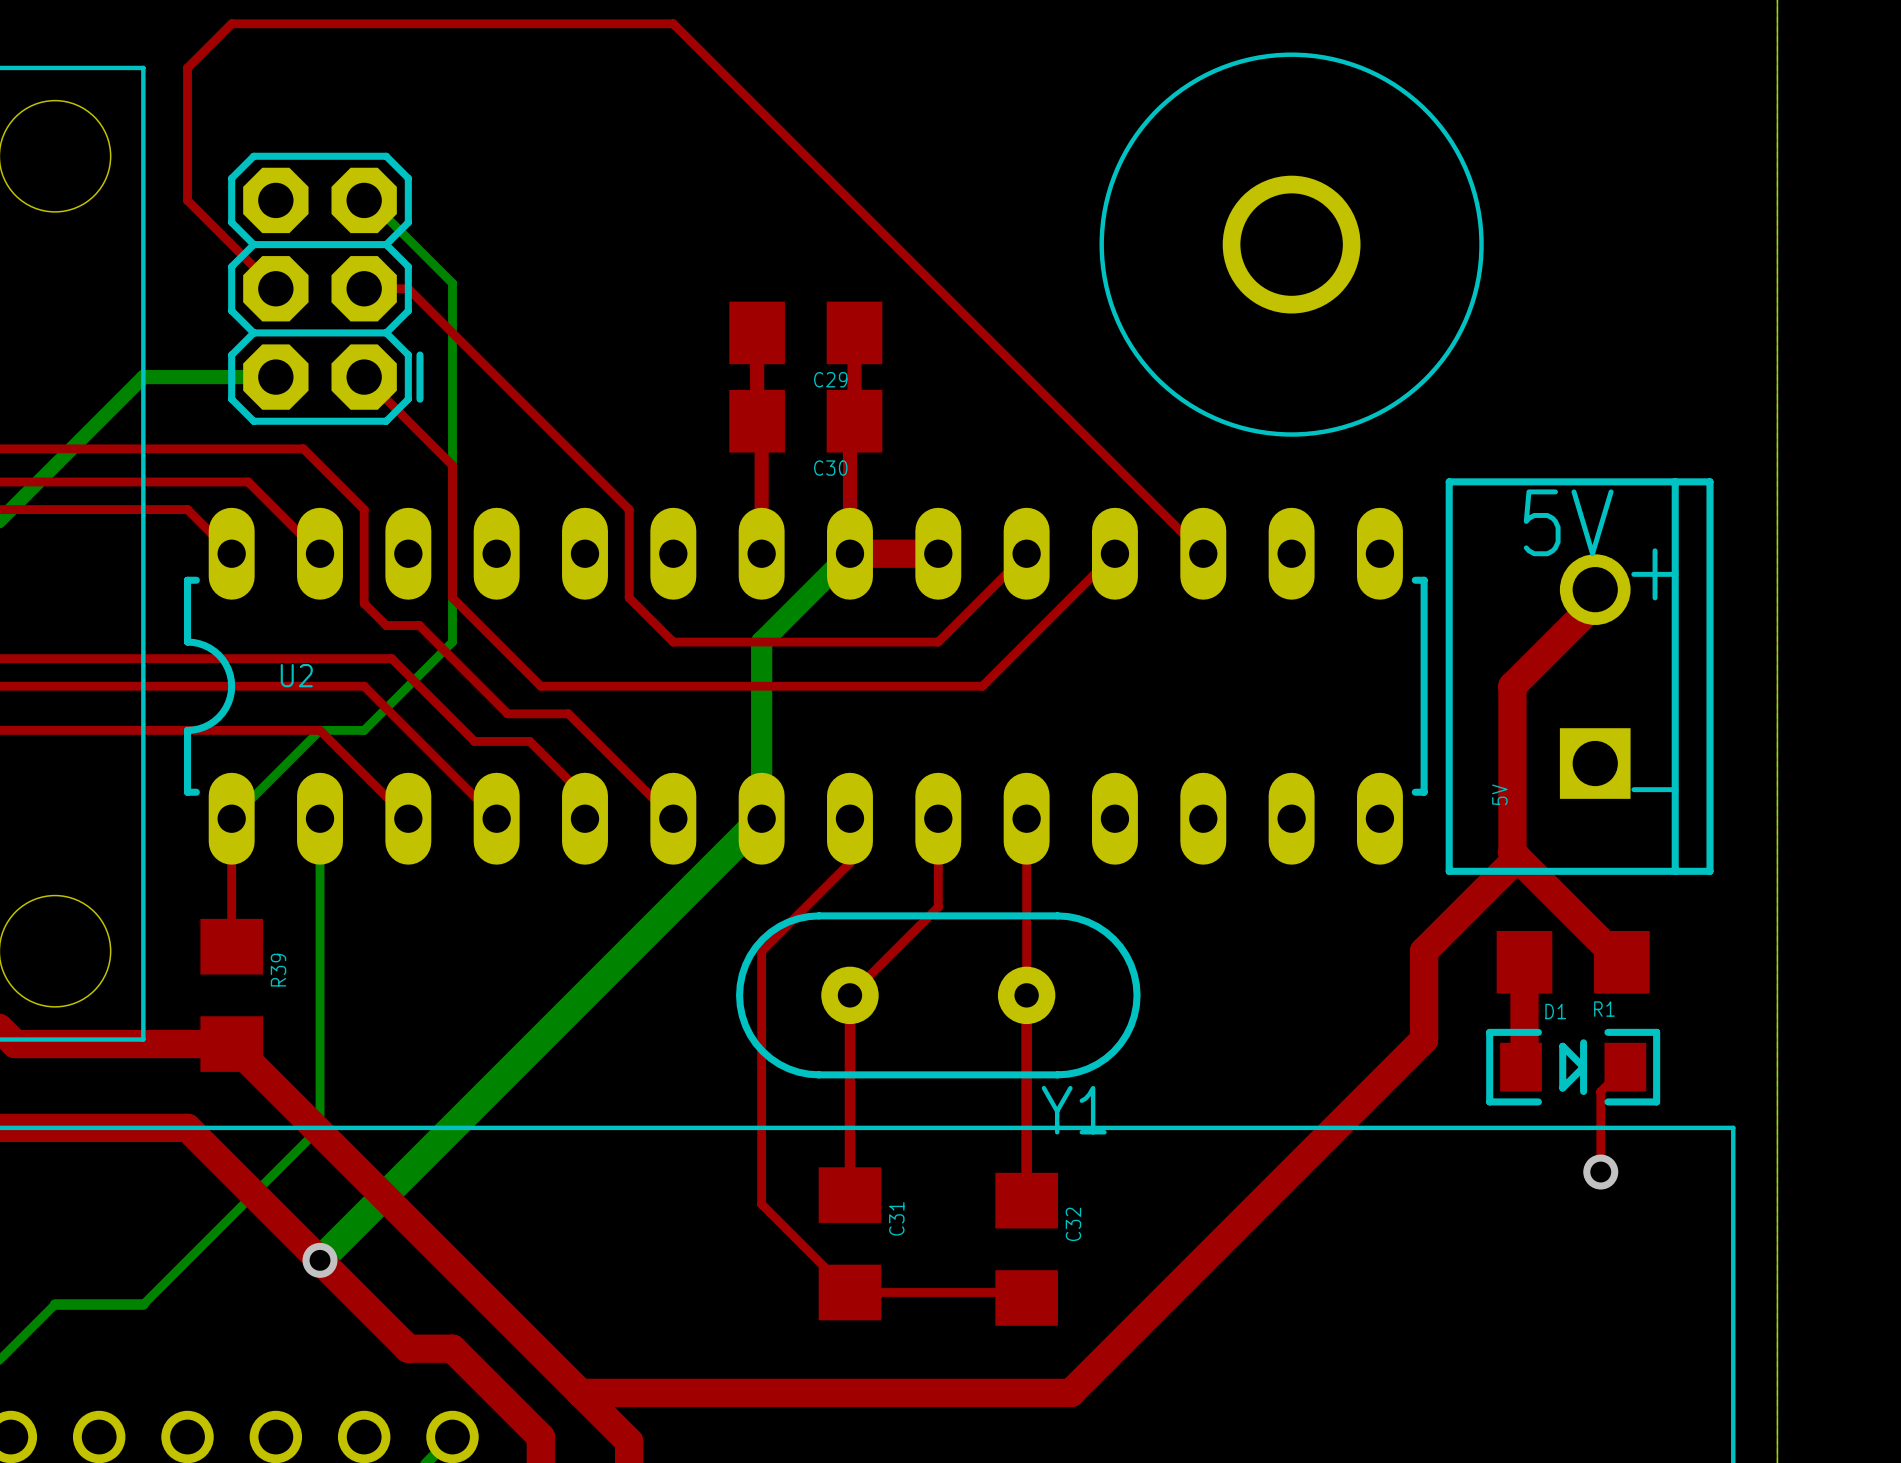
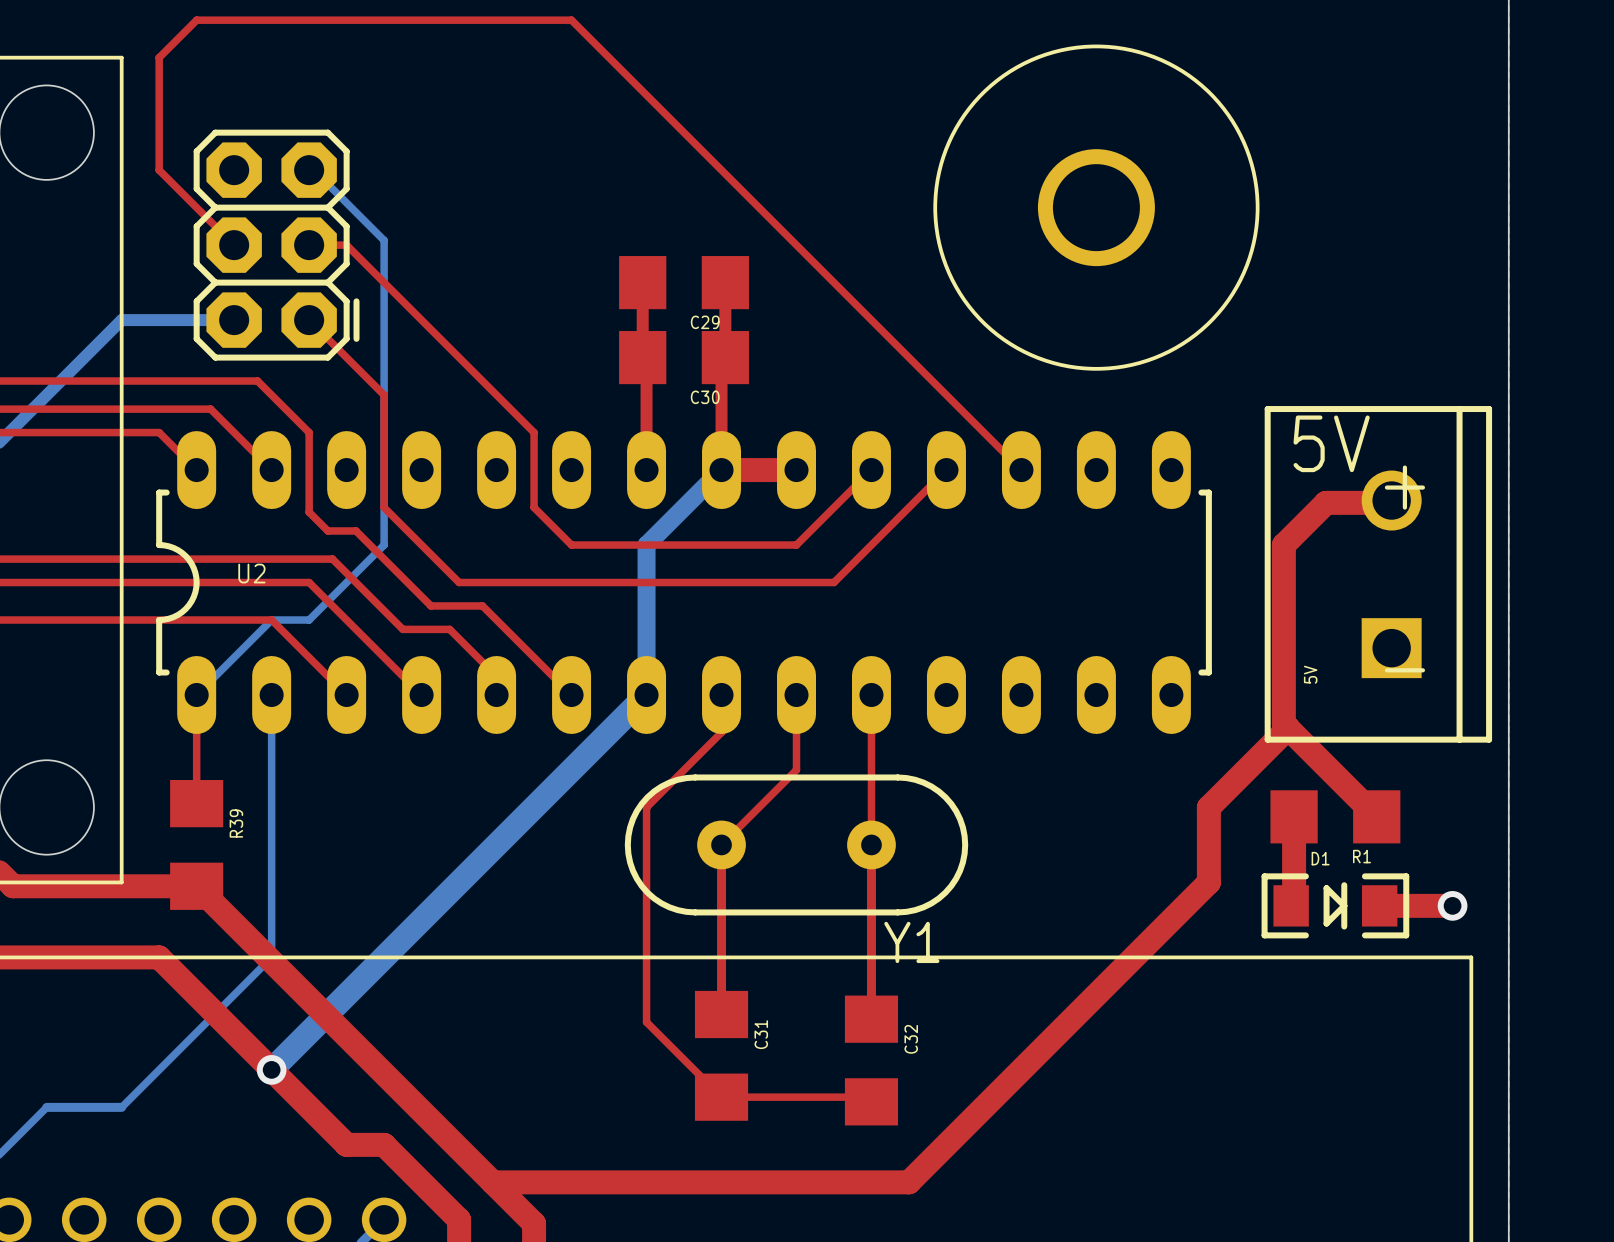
top track: (1595, 589) (1595, 603) (1512, 686) -> (1391, 500) (1389, 502) (1326, 502) (1283, 545) (1283, 582)
5V position: (1579, 676) -> (1378, 574)
top track: (1625, 1067) (1600, 1091) (1600, 1172) -> (1379, 905) (1452, 905)
via position: (1600, 1172) -> (1452, 905)

